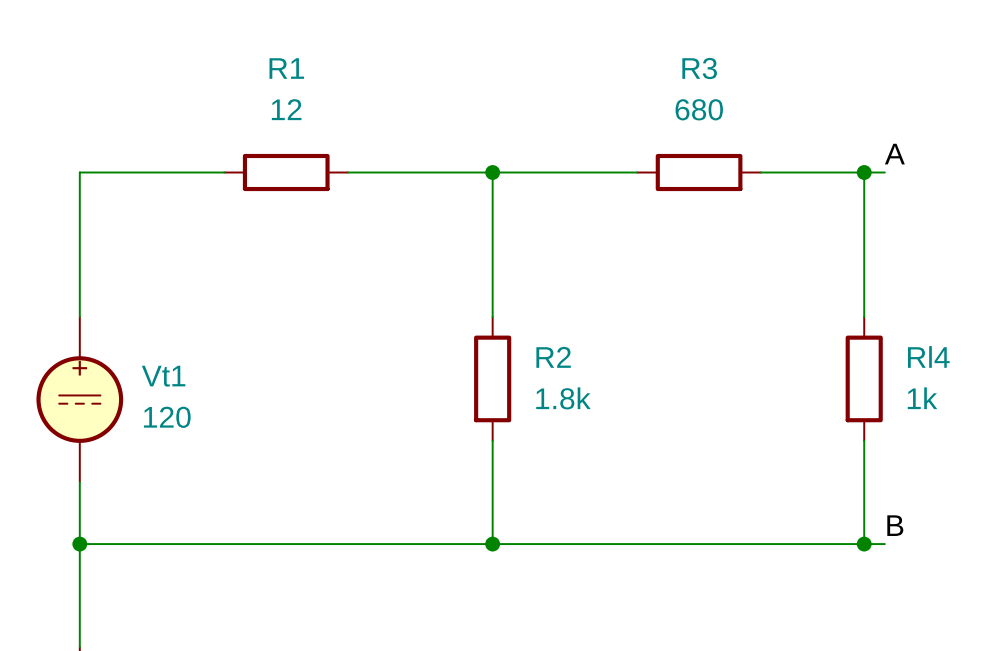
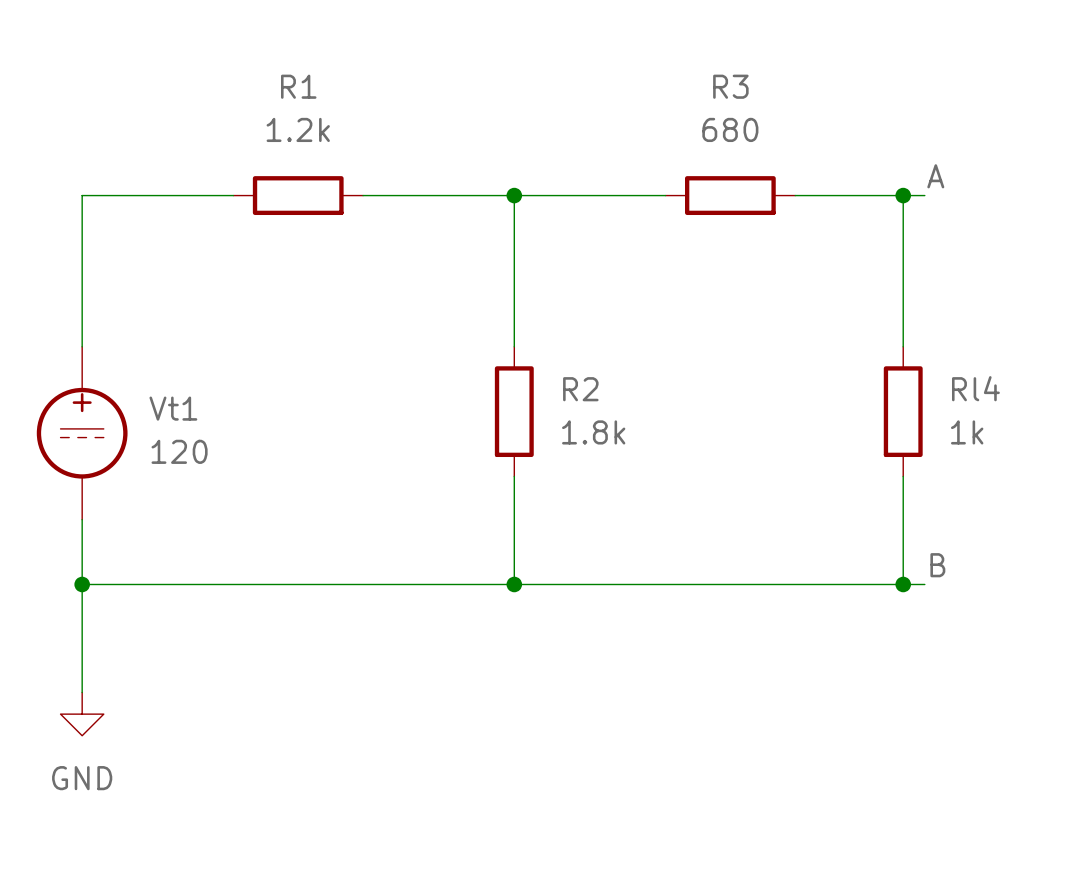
R1 value: 12 (286, 109) -> 1.2k (298, 129)

